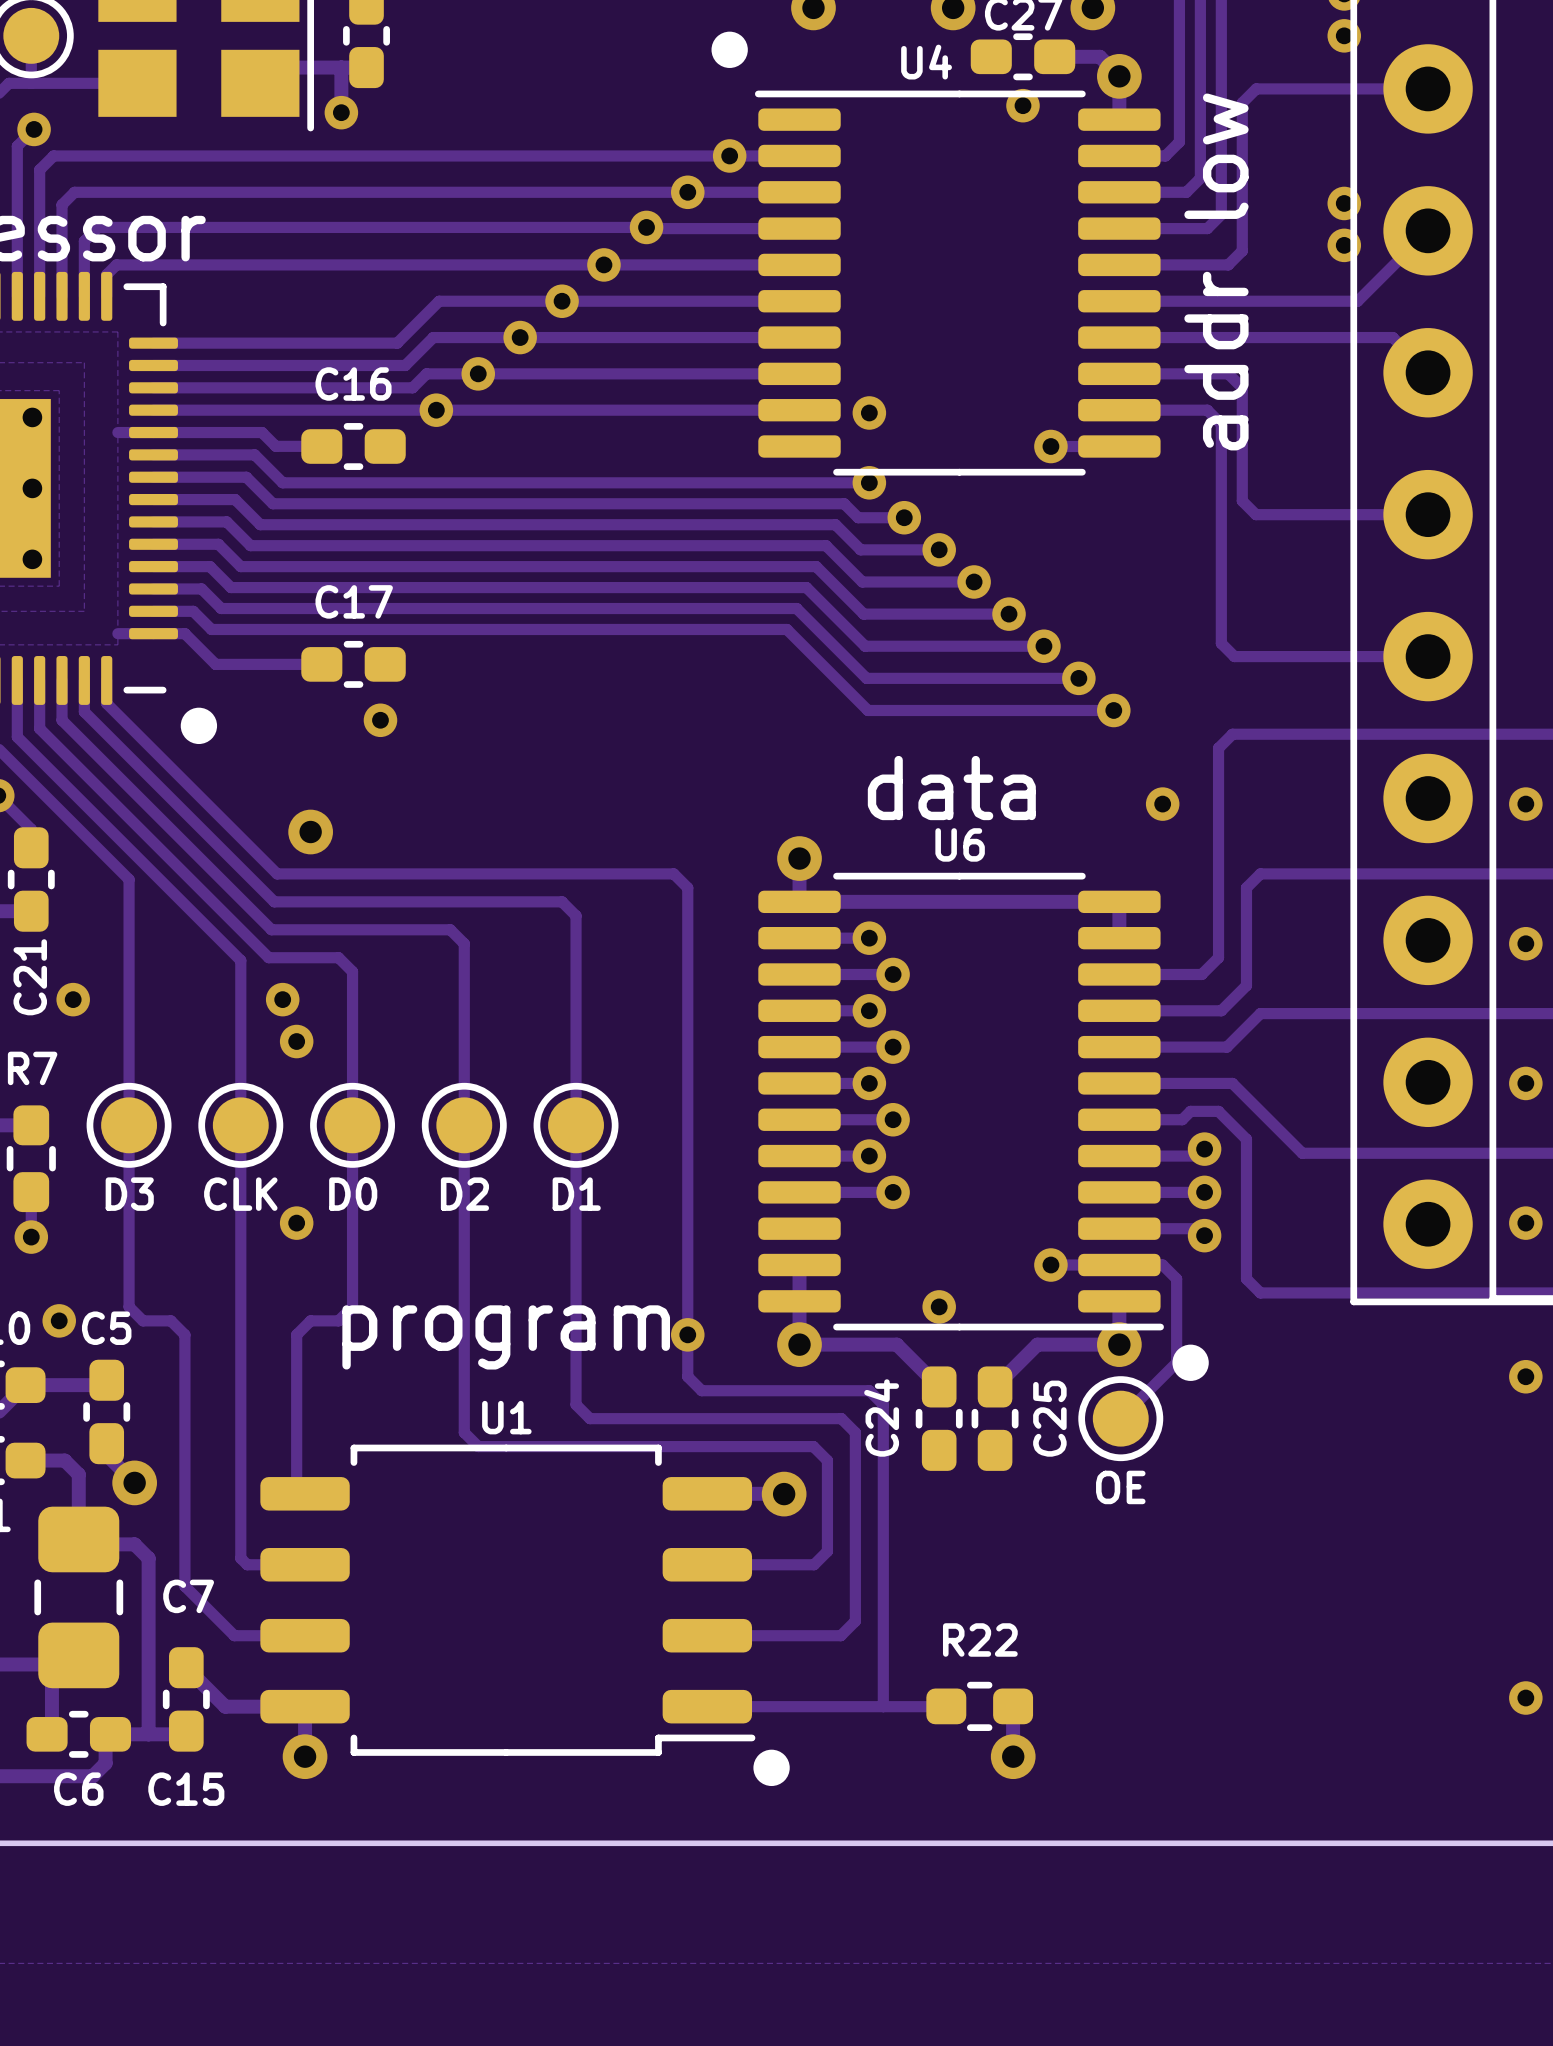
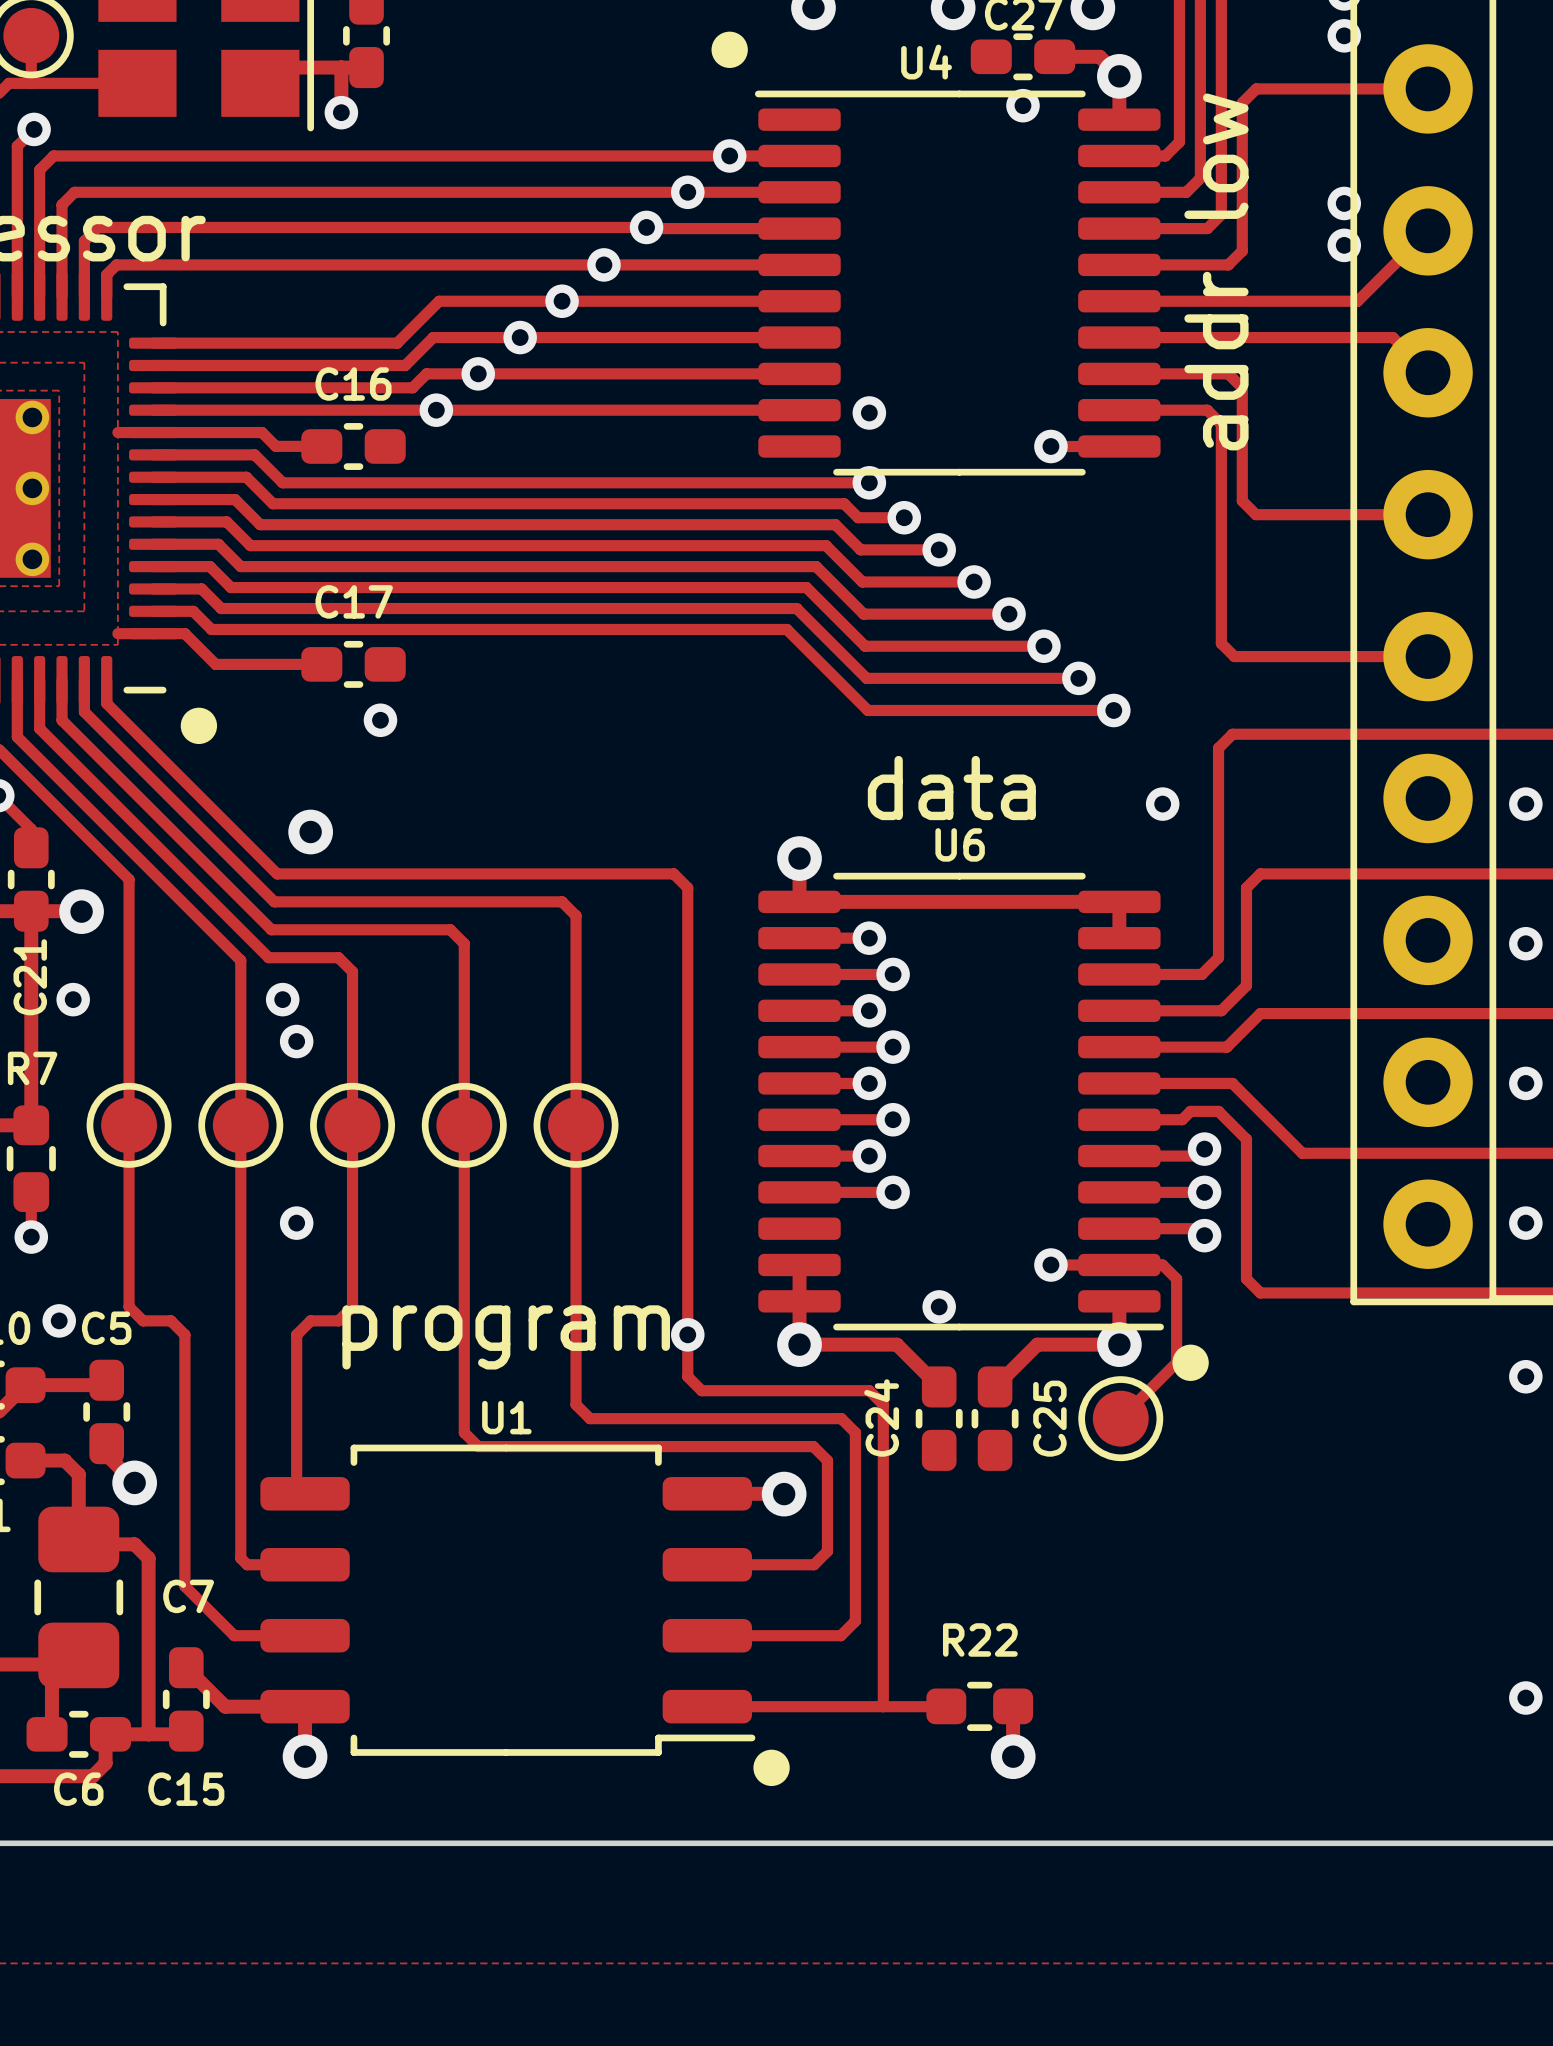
track: none -> (81, 911) (31, 911) (31, 1125)
via: none -> (81, 911)
text: D3 (129, 1194) -> none
text: CLK (240, 1194) -> none
text: D0 (353, 1194) -> none
text: D2 (464, 1194) -> none
text: D1 (576, 1194) -> none
text: OE (1120, 1487) -> none

